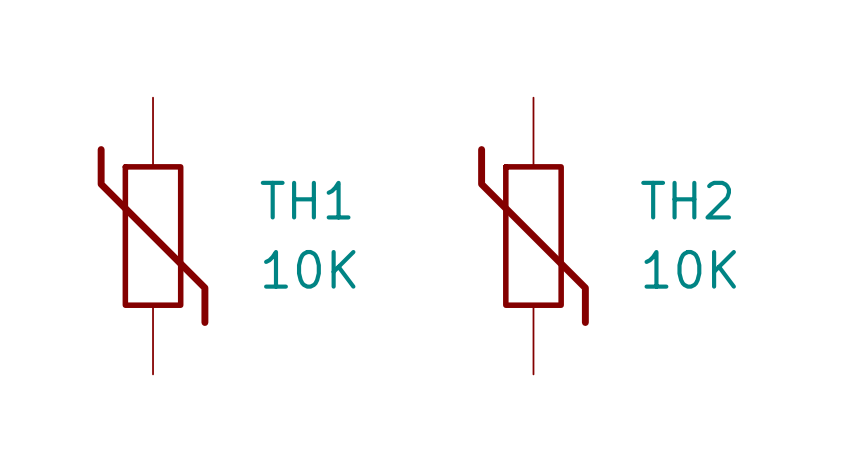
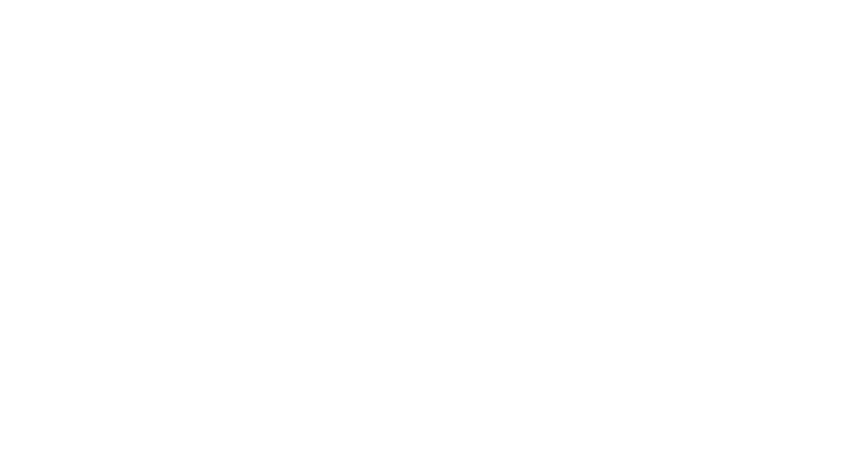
TH1: 10K (153, 236) -> none
TH2: 10K (533, 236) -> none

